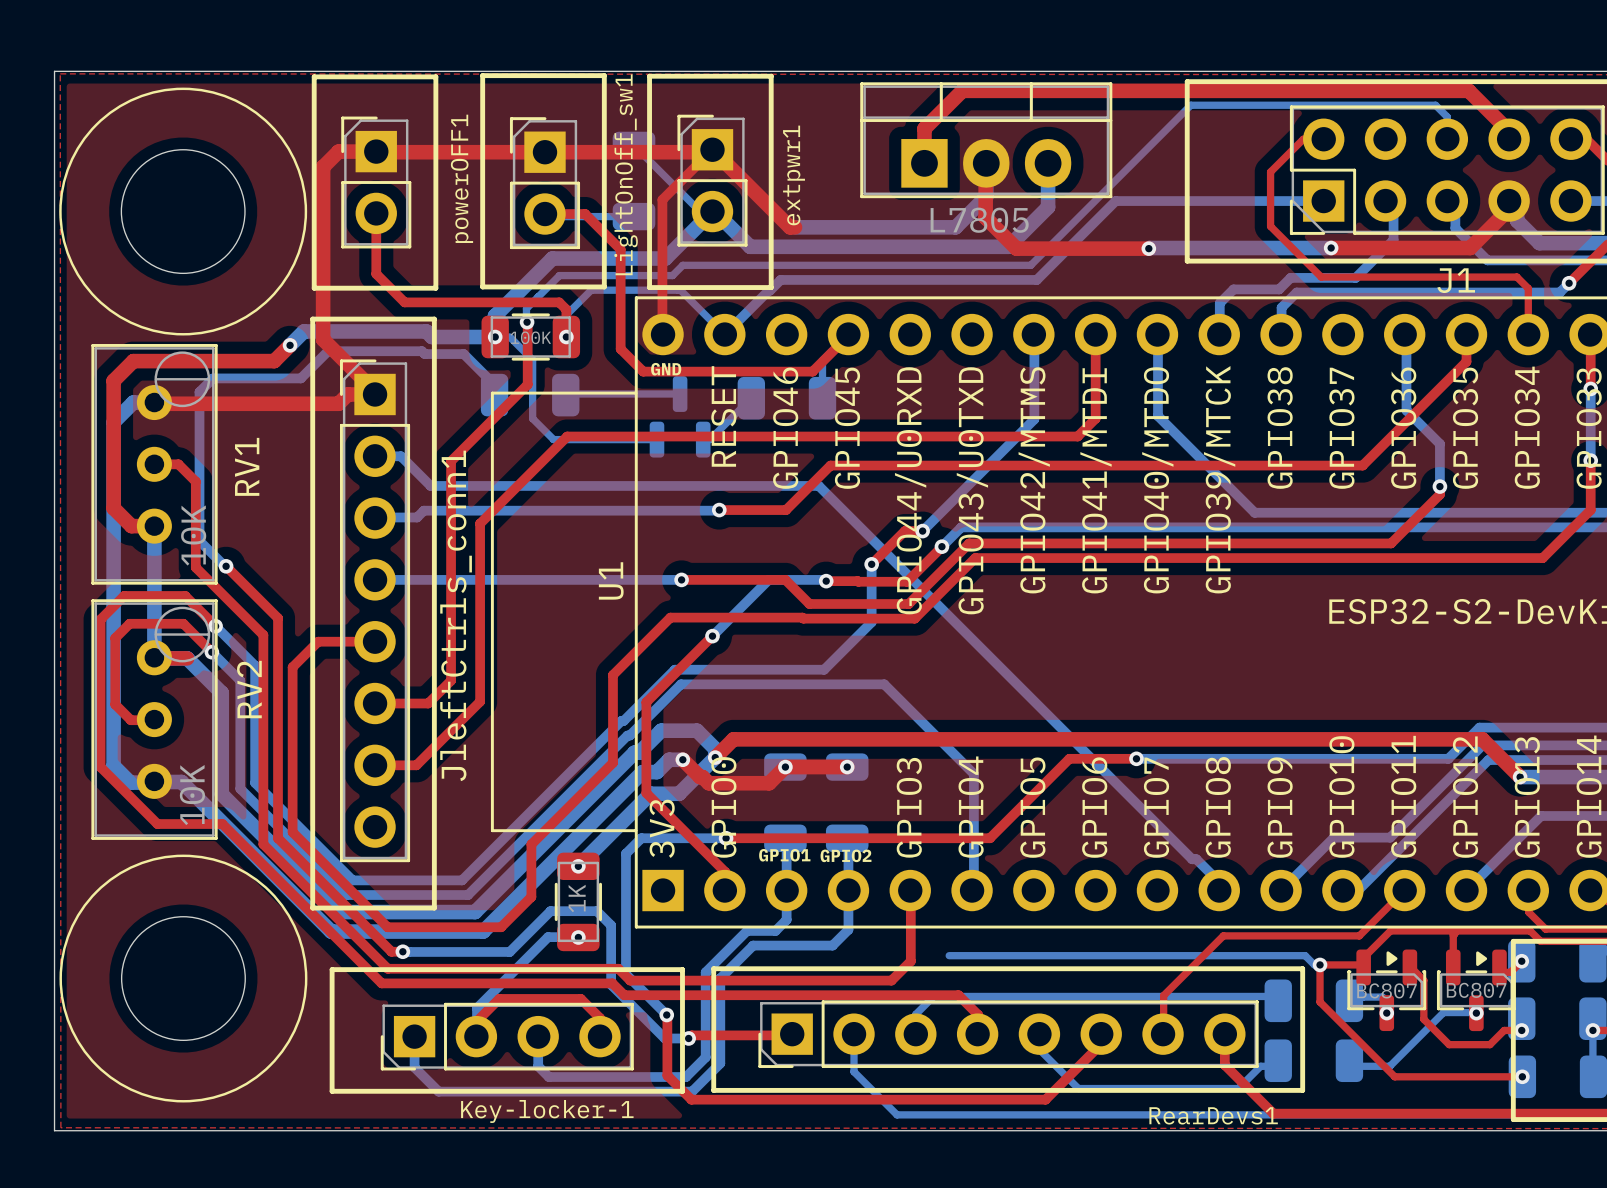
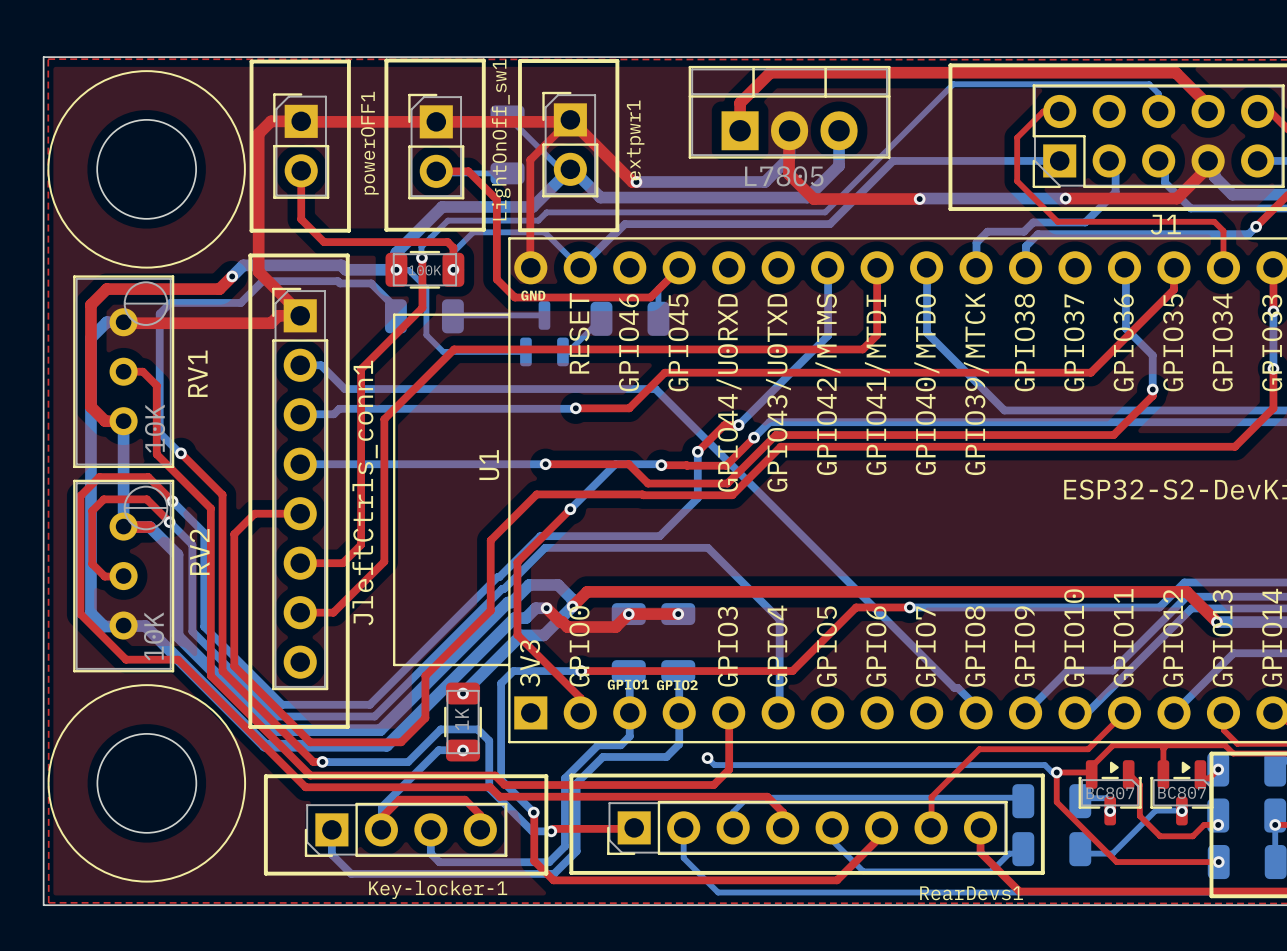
via: none -> (636, 181)
bottom track: none -> (707, 758) (714, 765) (759, 765)
via: none -> (707, 758)

